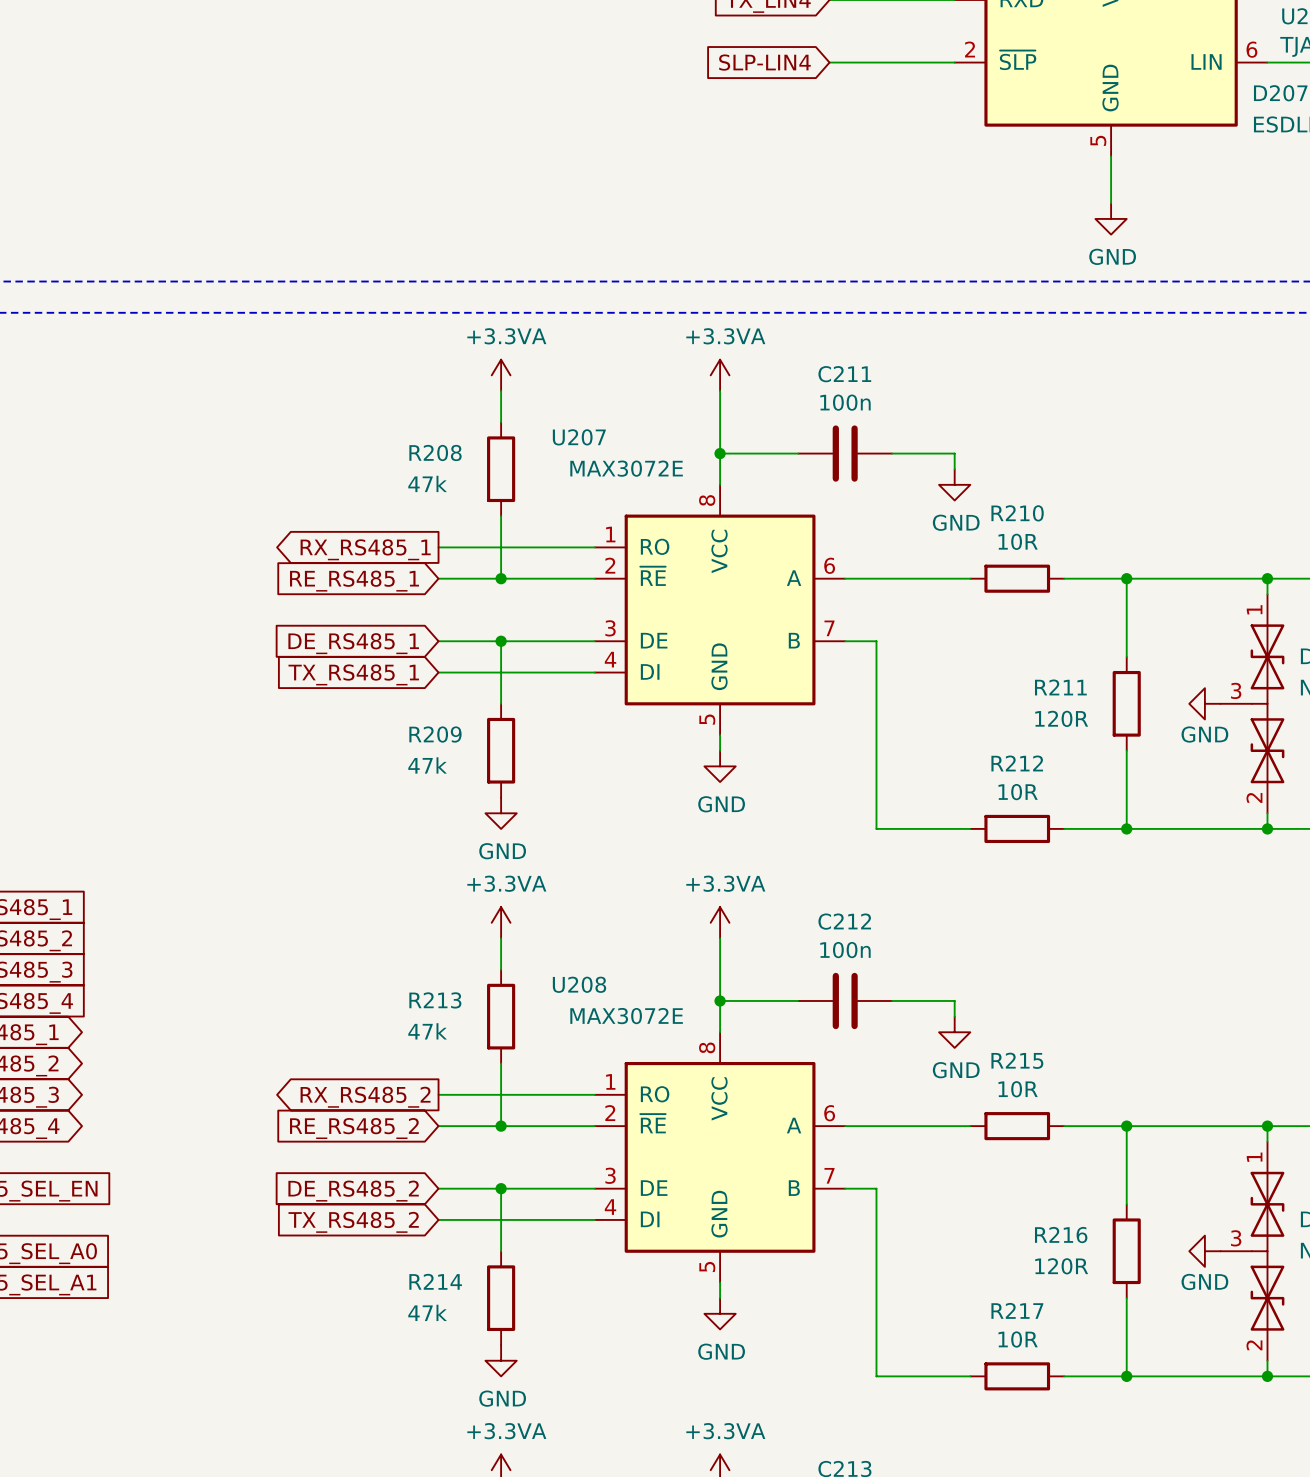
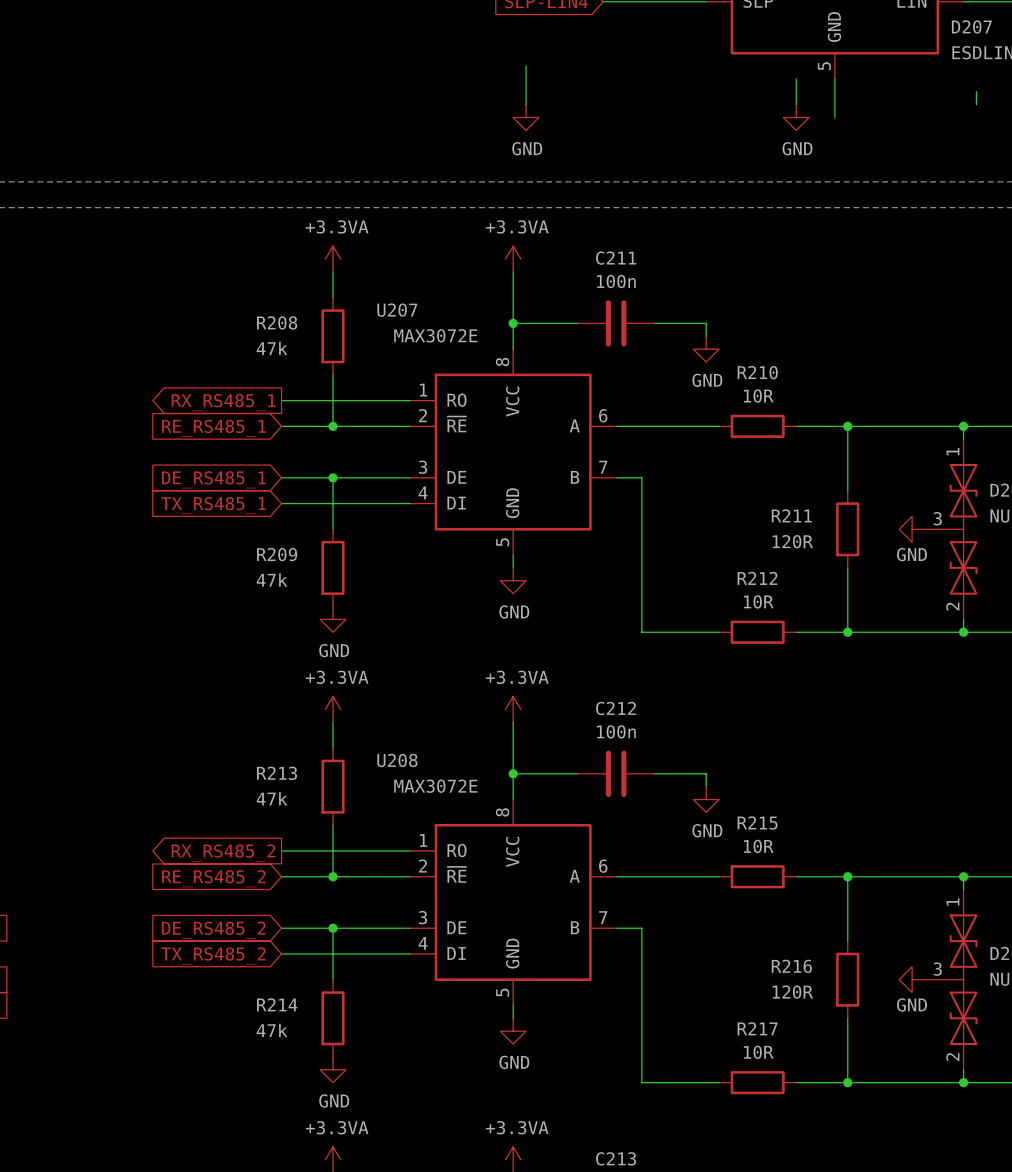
wire: none -> (526, 66) (526, 104)
wire: none -> (796, 78) (796, 104)
wire: none -> (976, 91) (976, 104)
power symbol: none -> GND (526, 117)
power symbol position: GND (1111, 218) -> GND (796, 117)

